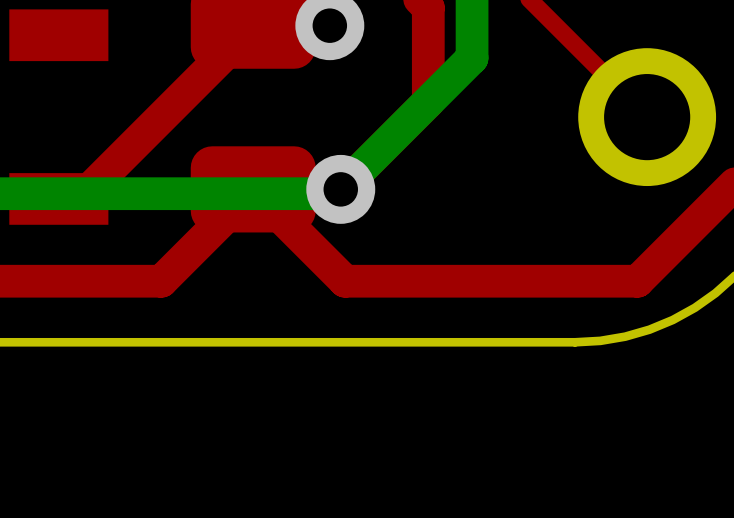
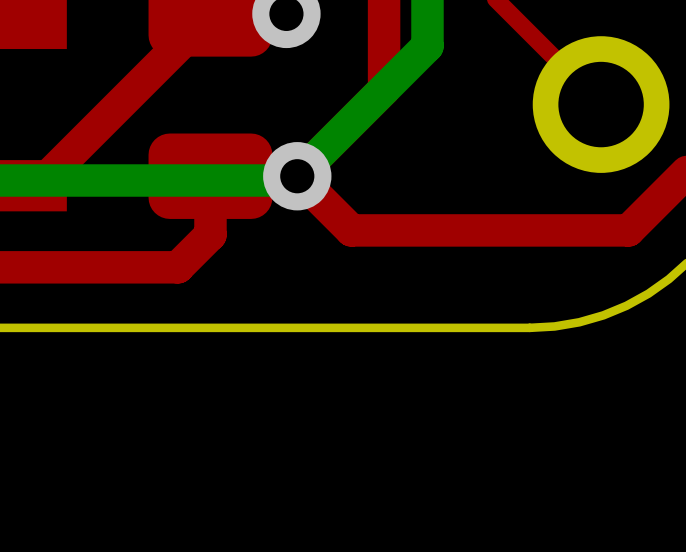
top track: none -> (210, 176) (210, 234) (177, 267) (119, 267)
top track: (674, 244) (637, 281) (345, 281) (253, 189) (161, 281) -> (628, 230) (351, 230) (297, 176)

